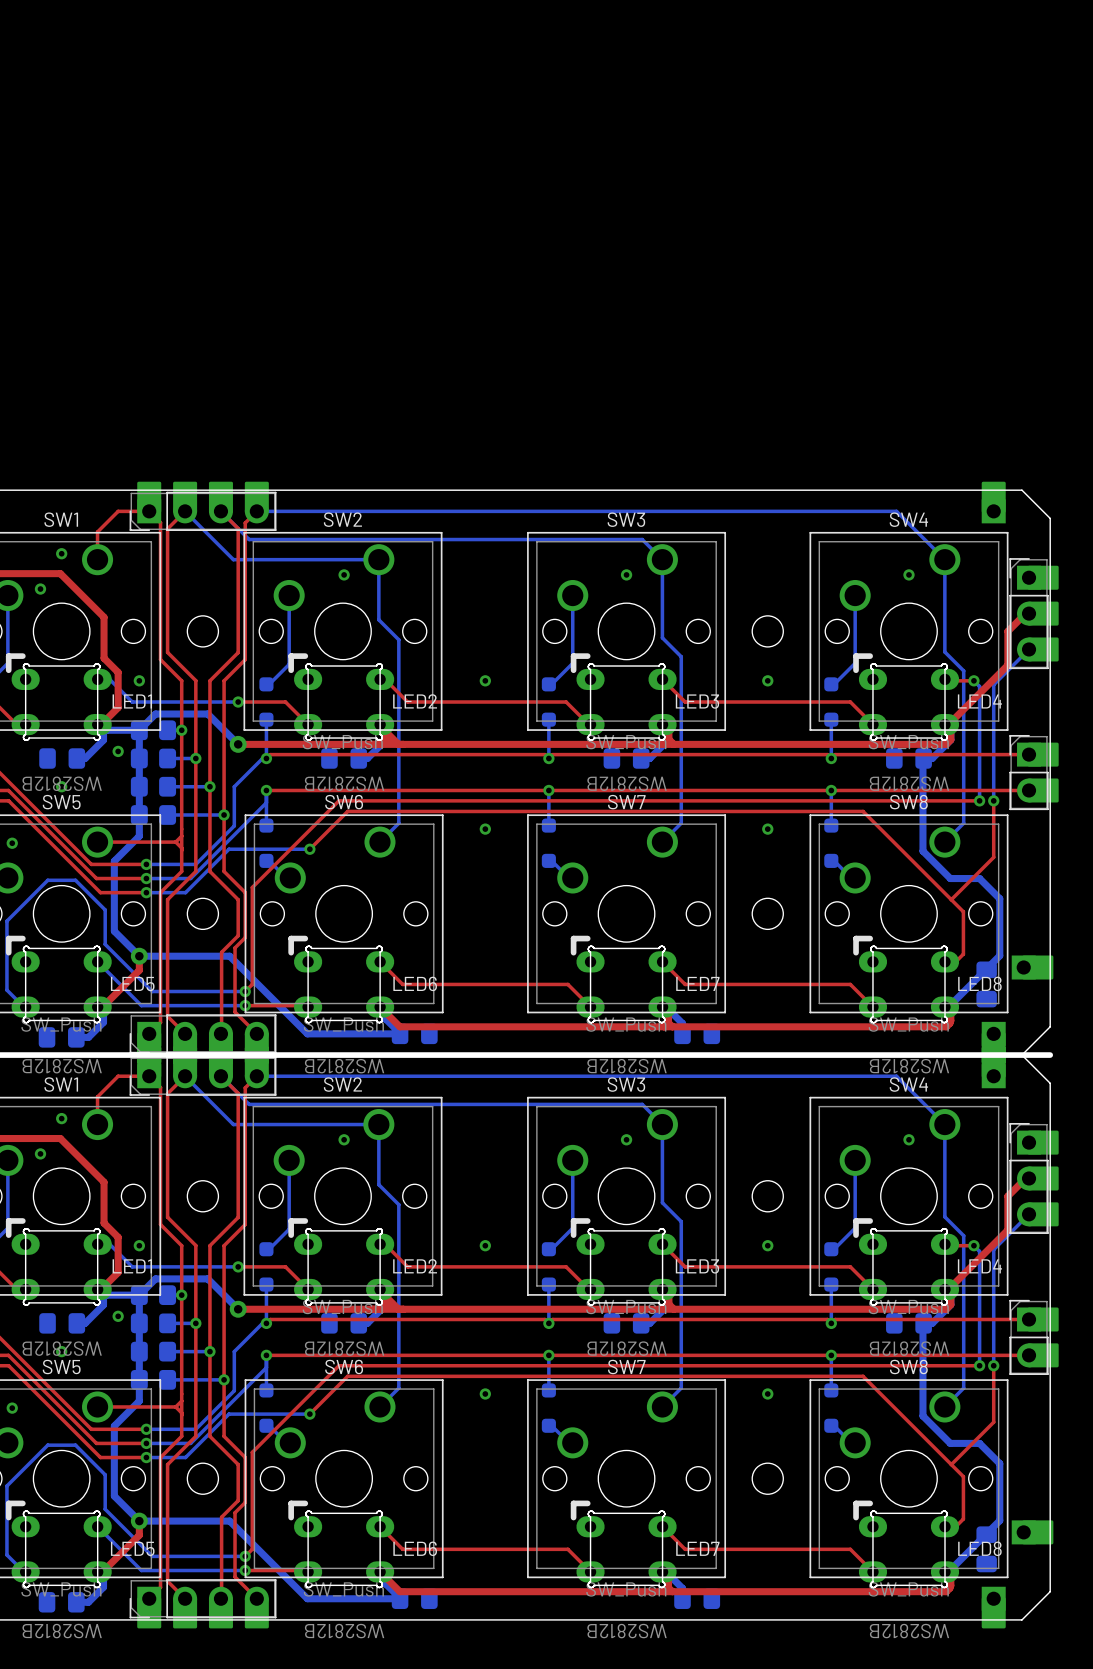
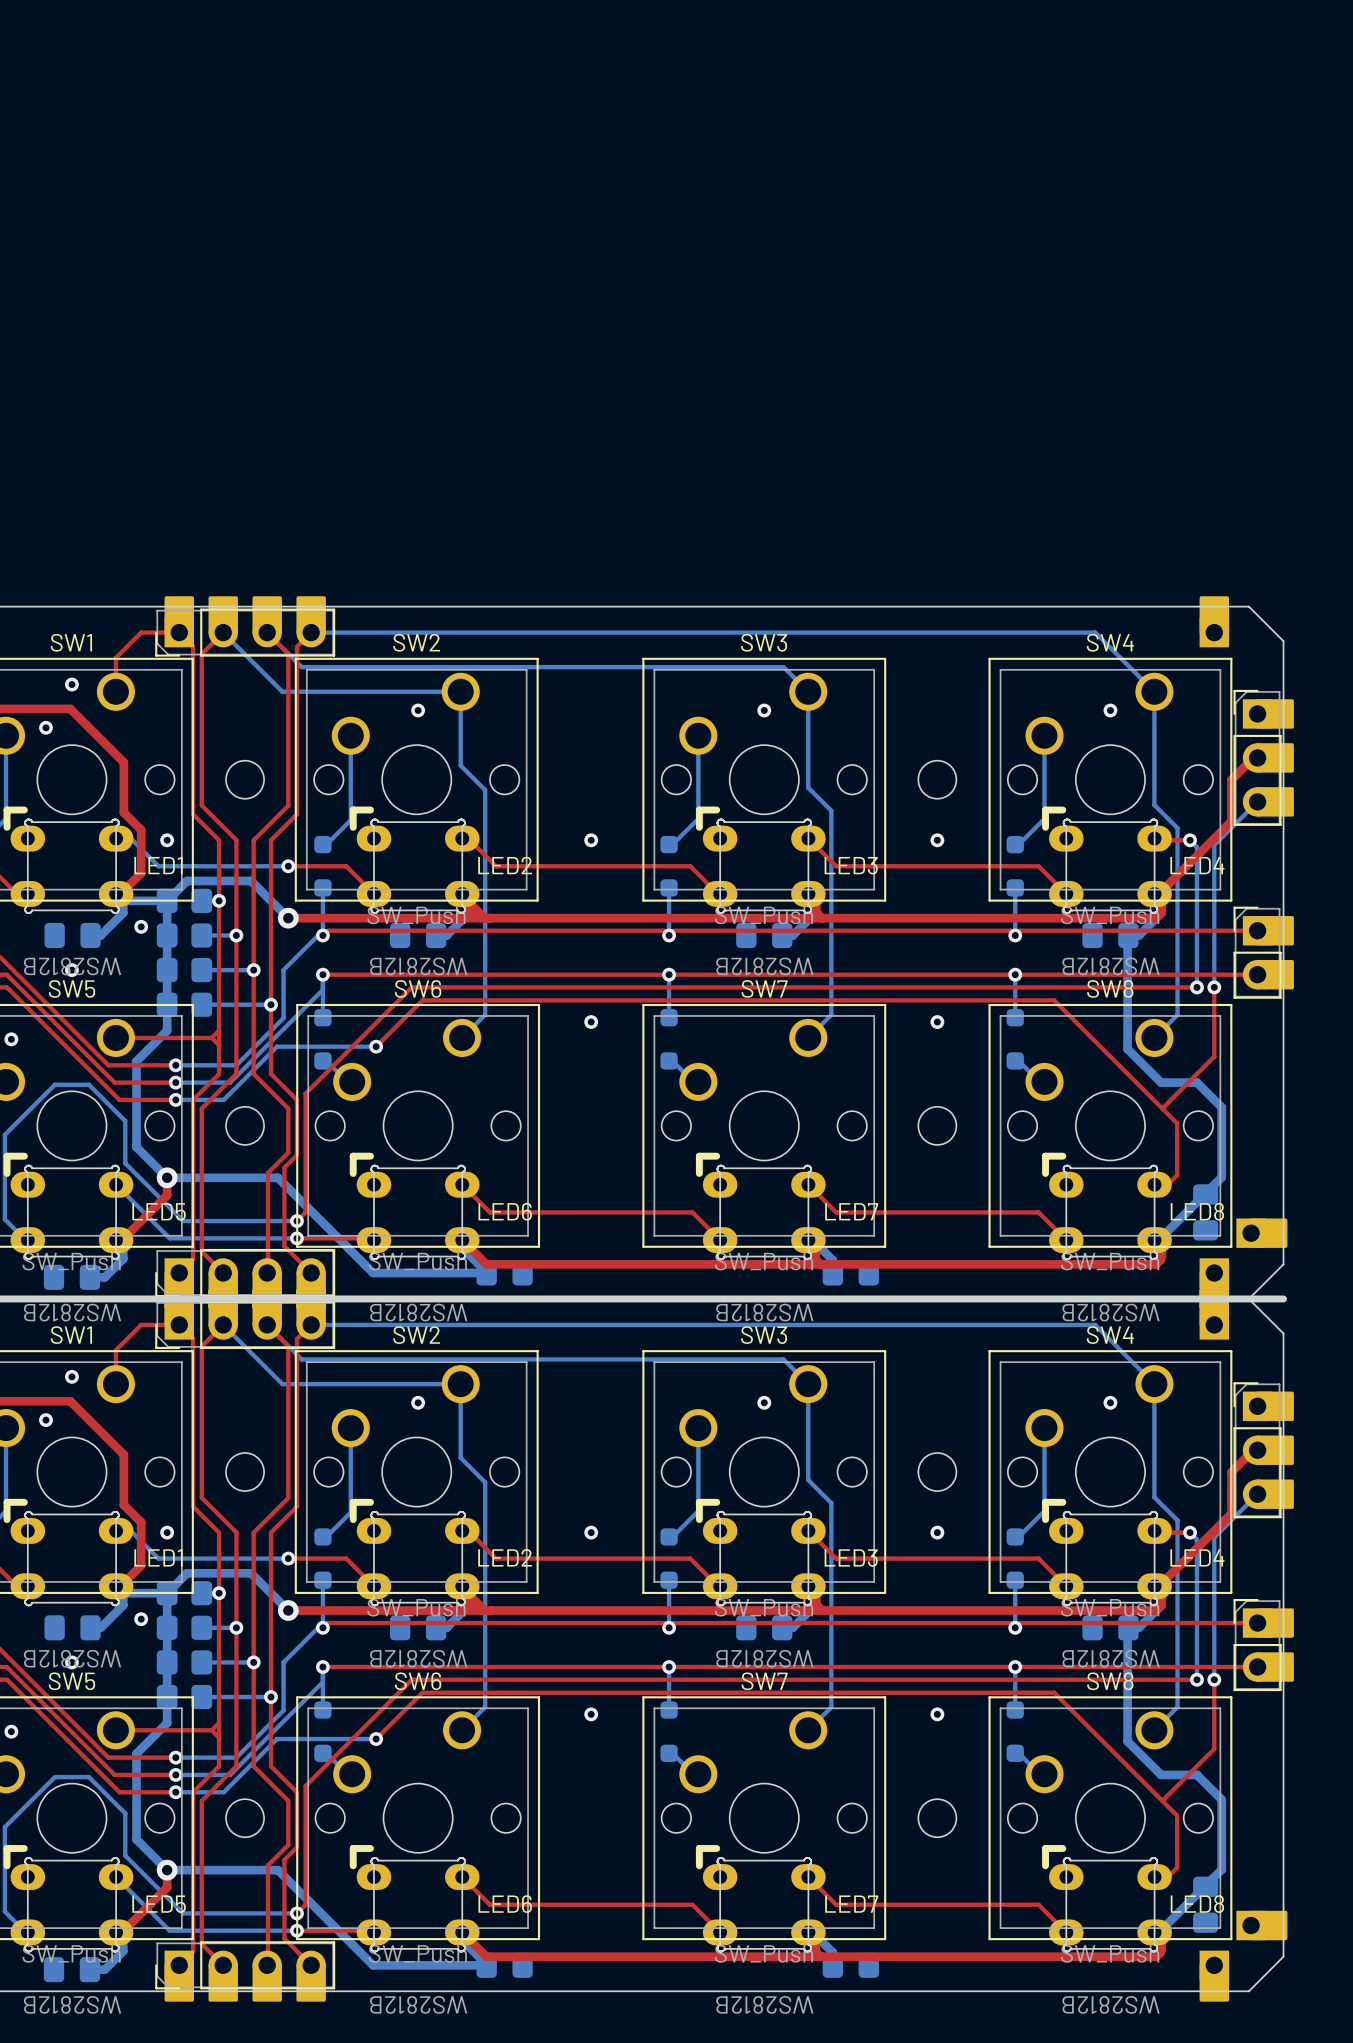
part position: (1032, 967) -> (1261, 1233)
part position: (1032, 1532) -> (1261, 1925)

